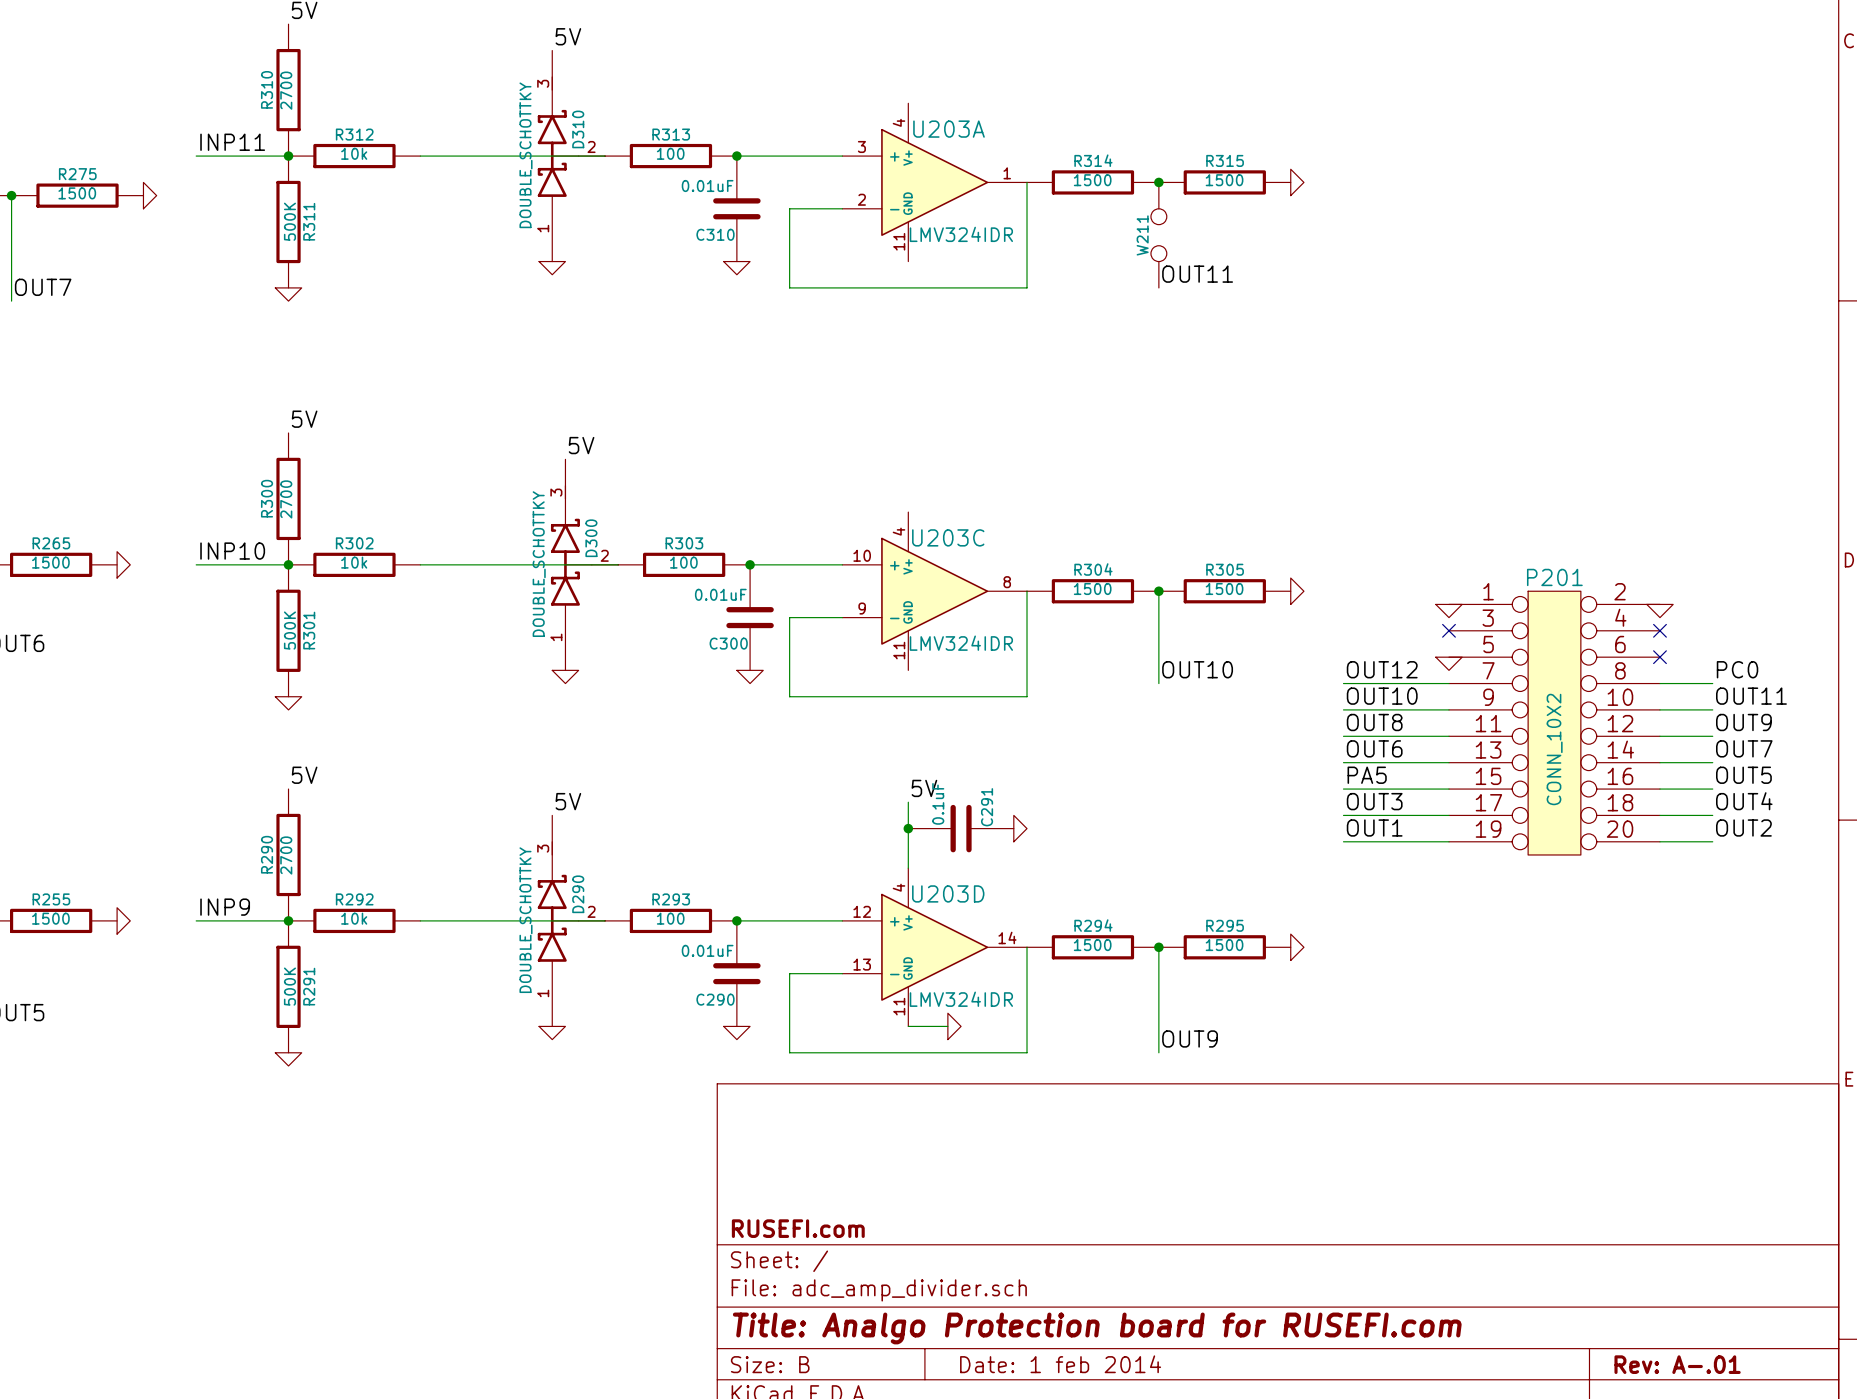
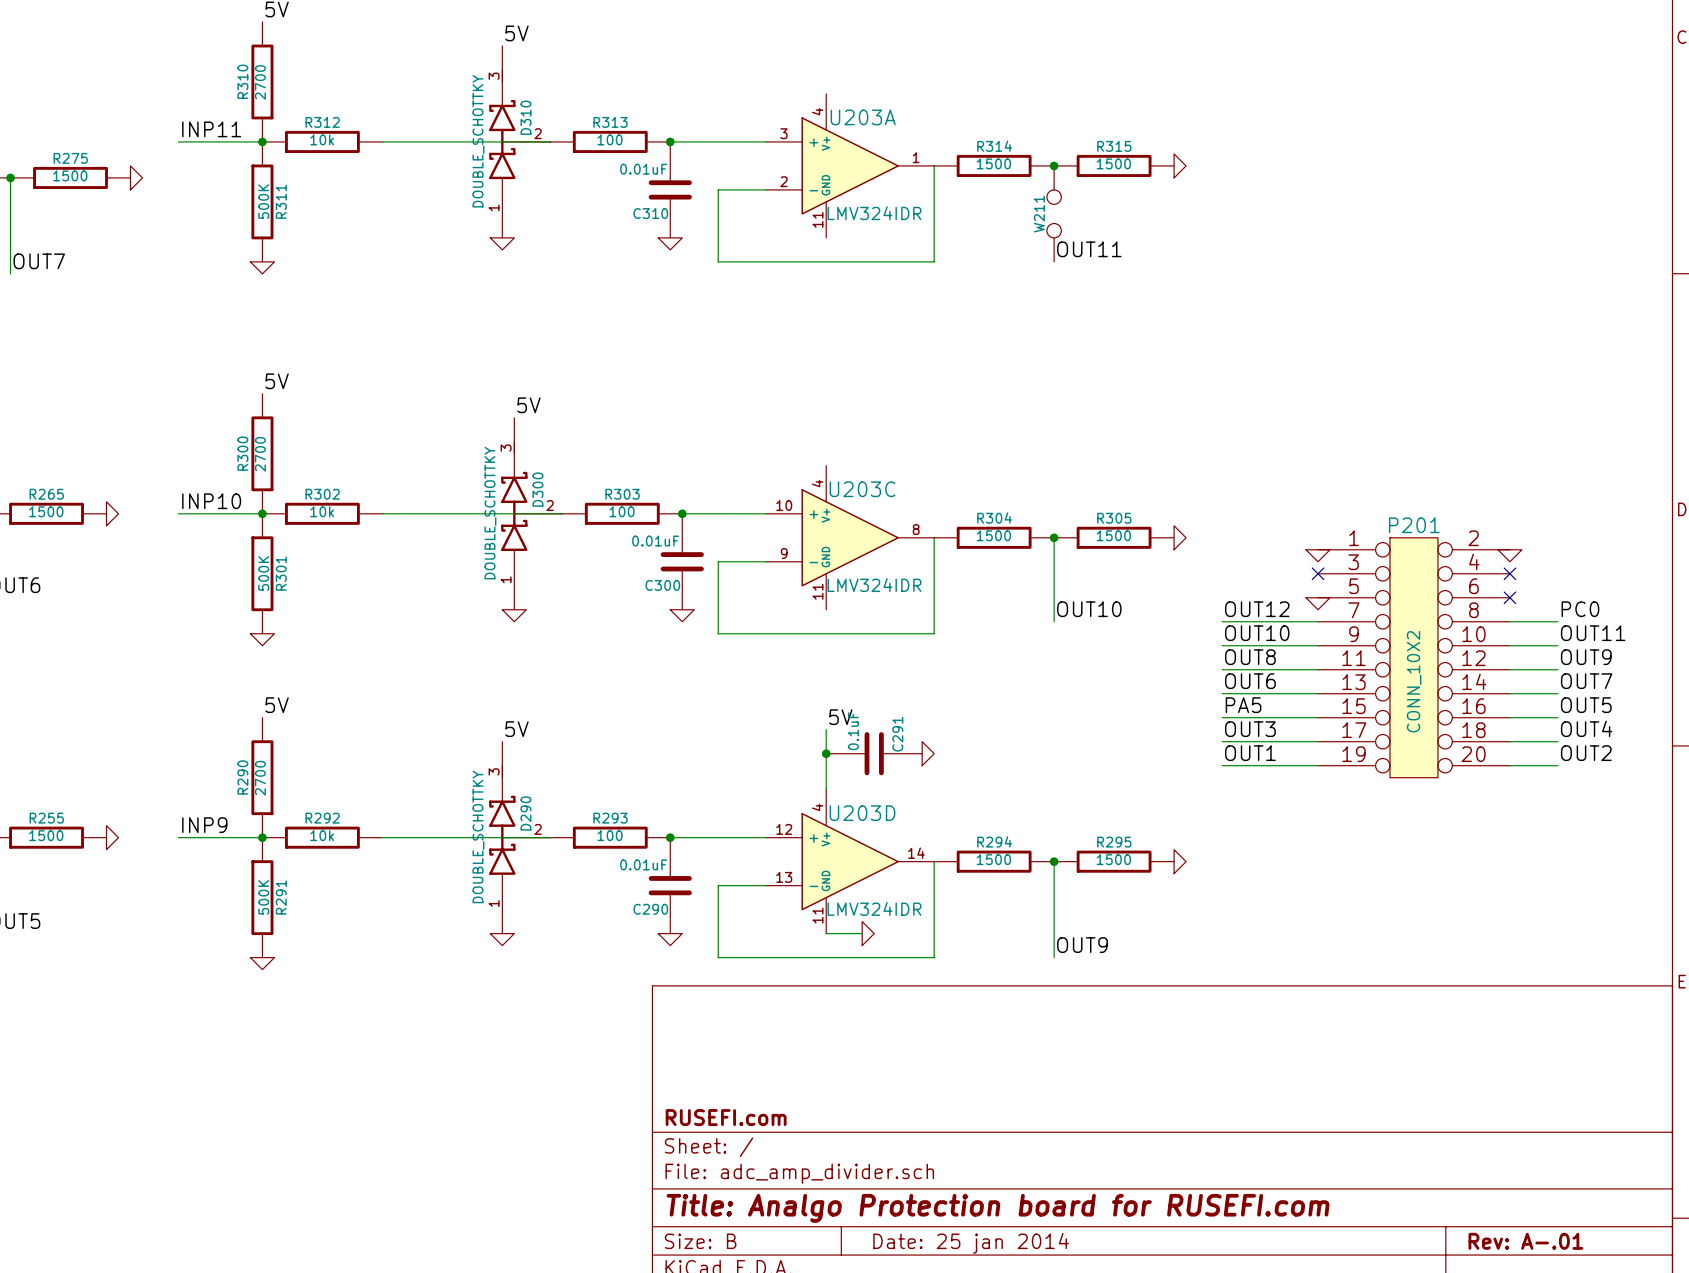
title block: Date: 1 feb 2014 (1060, 1364) -> Date: 25 jan 2014 (971, 1243)

